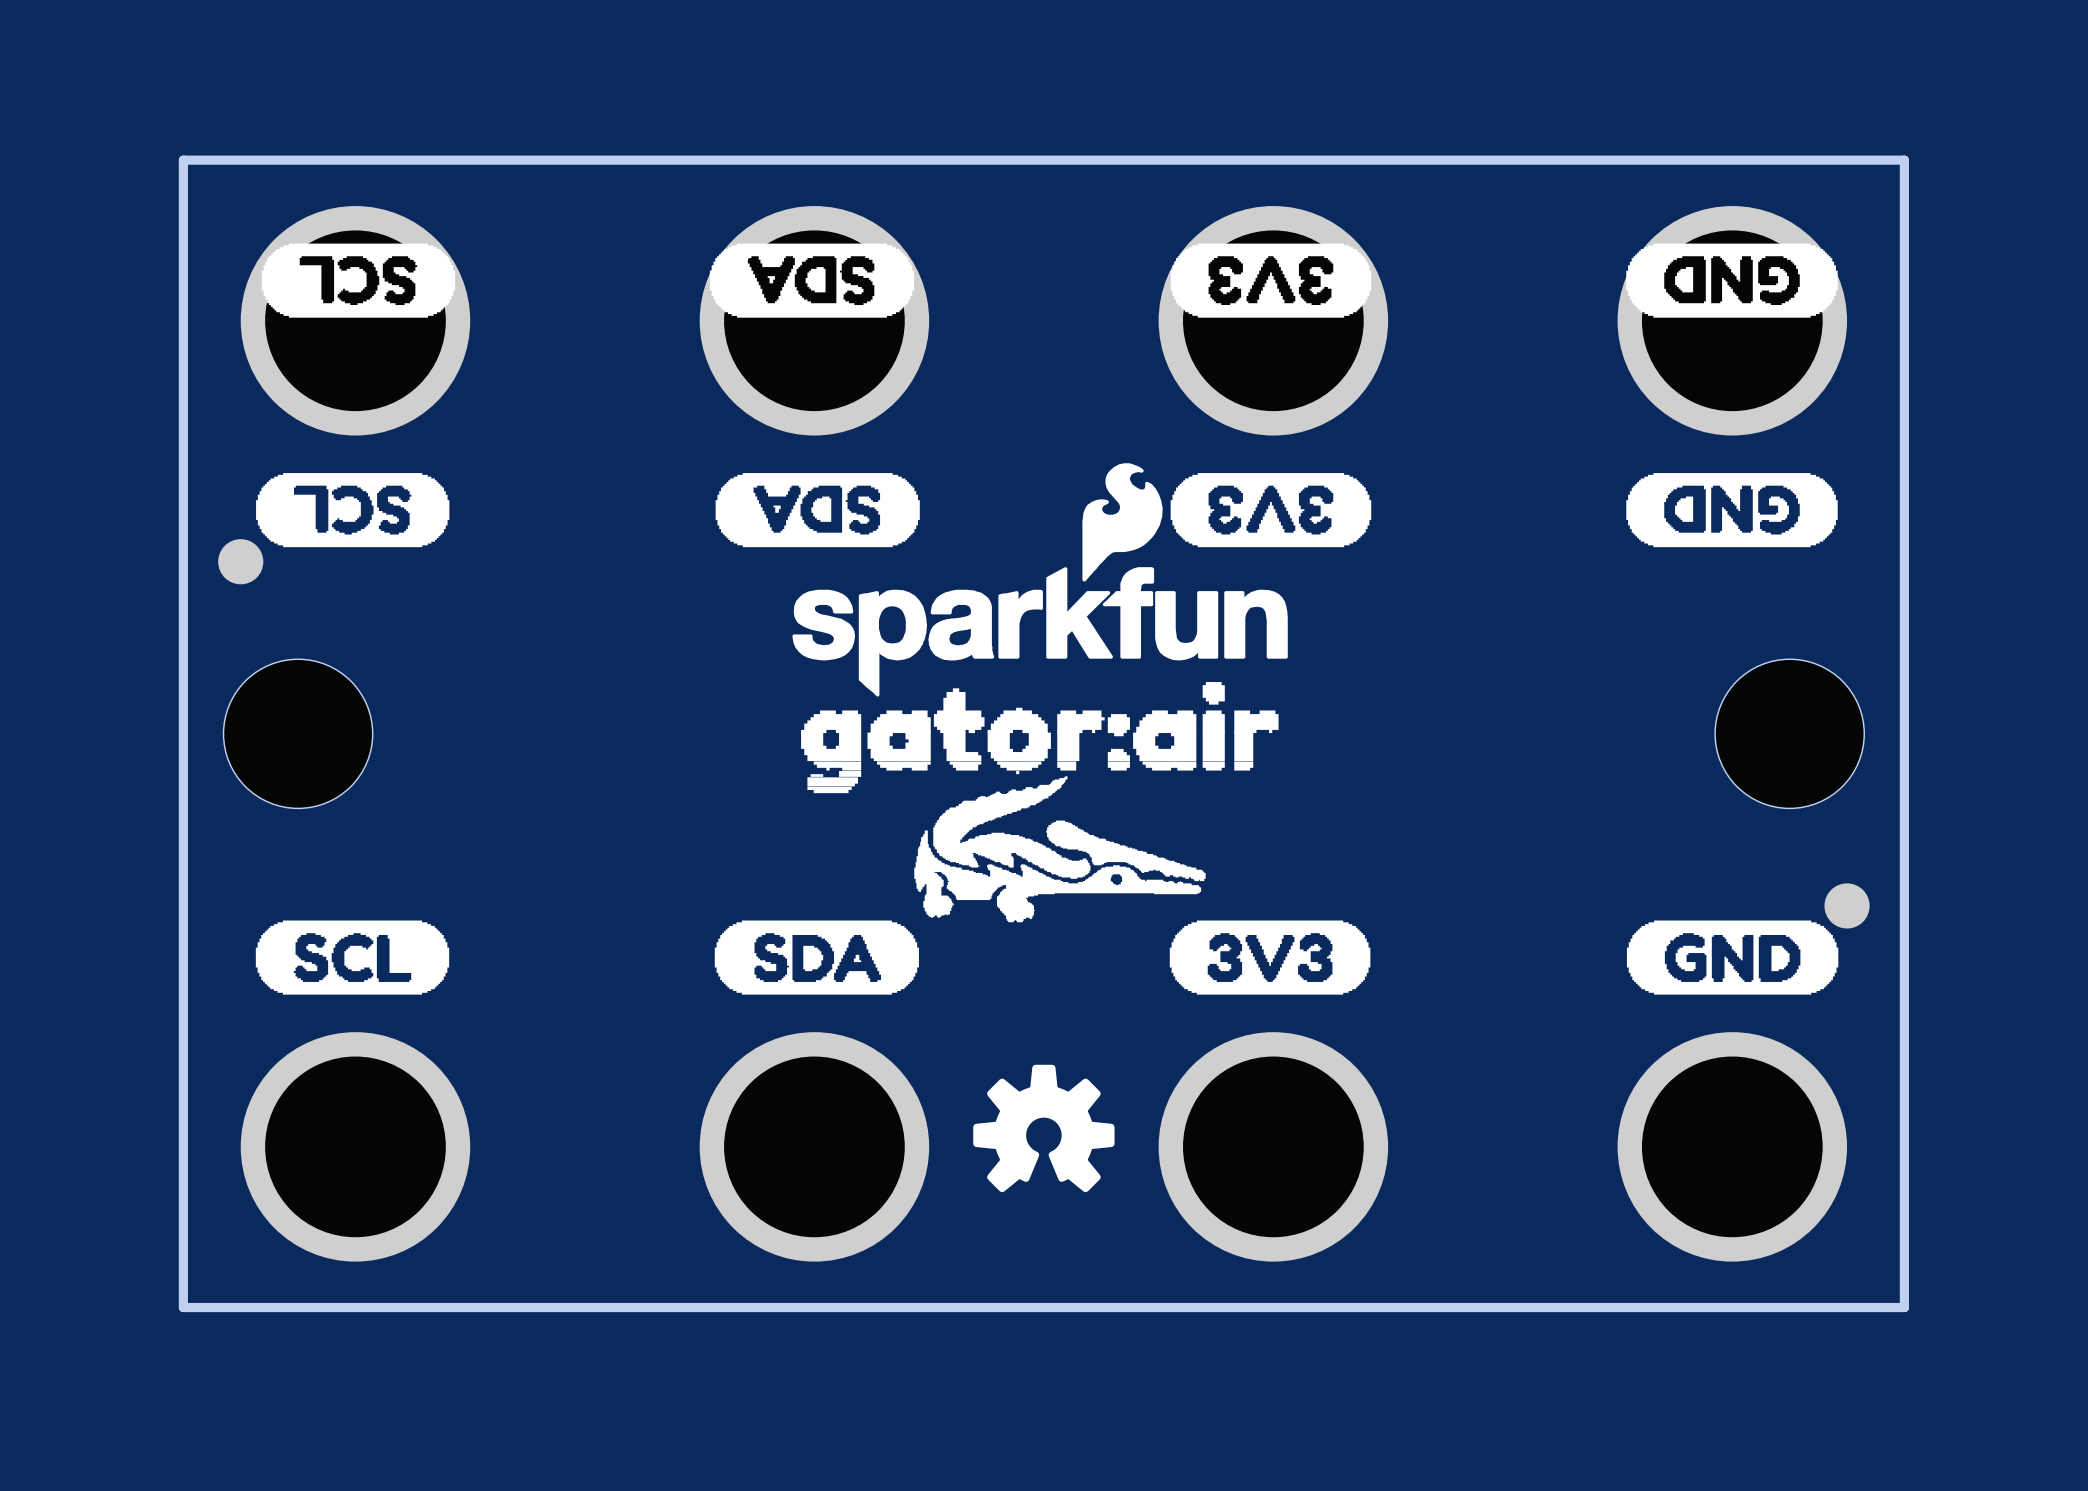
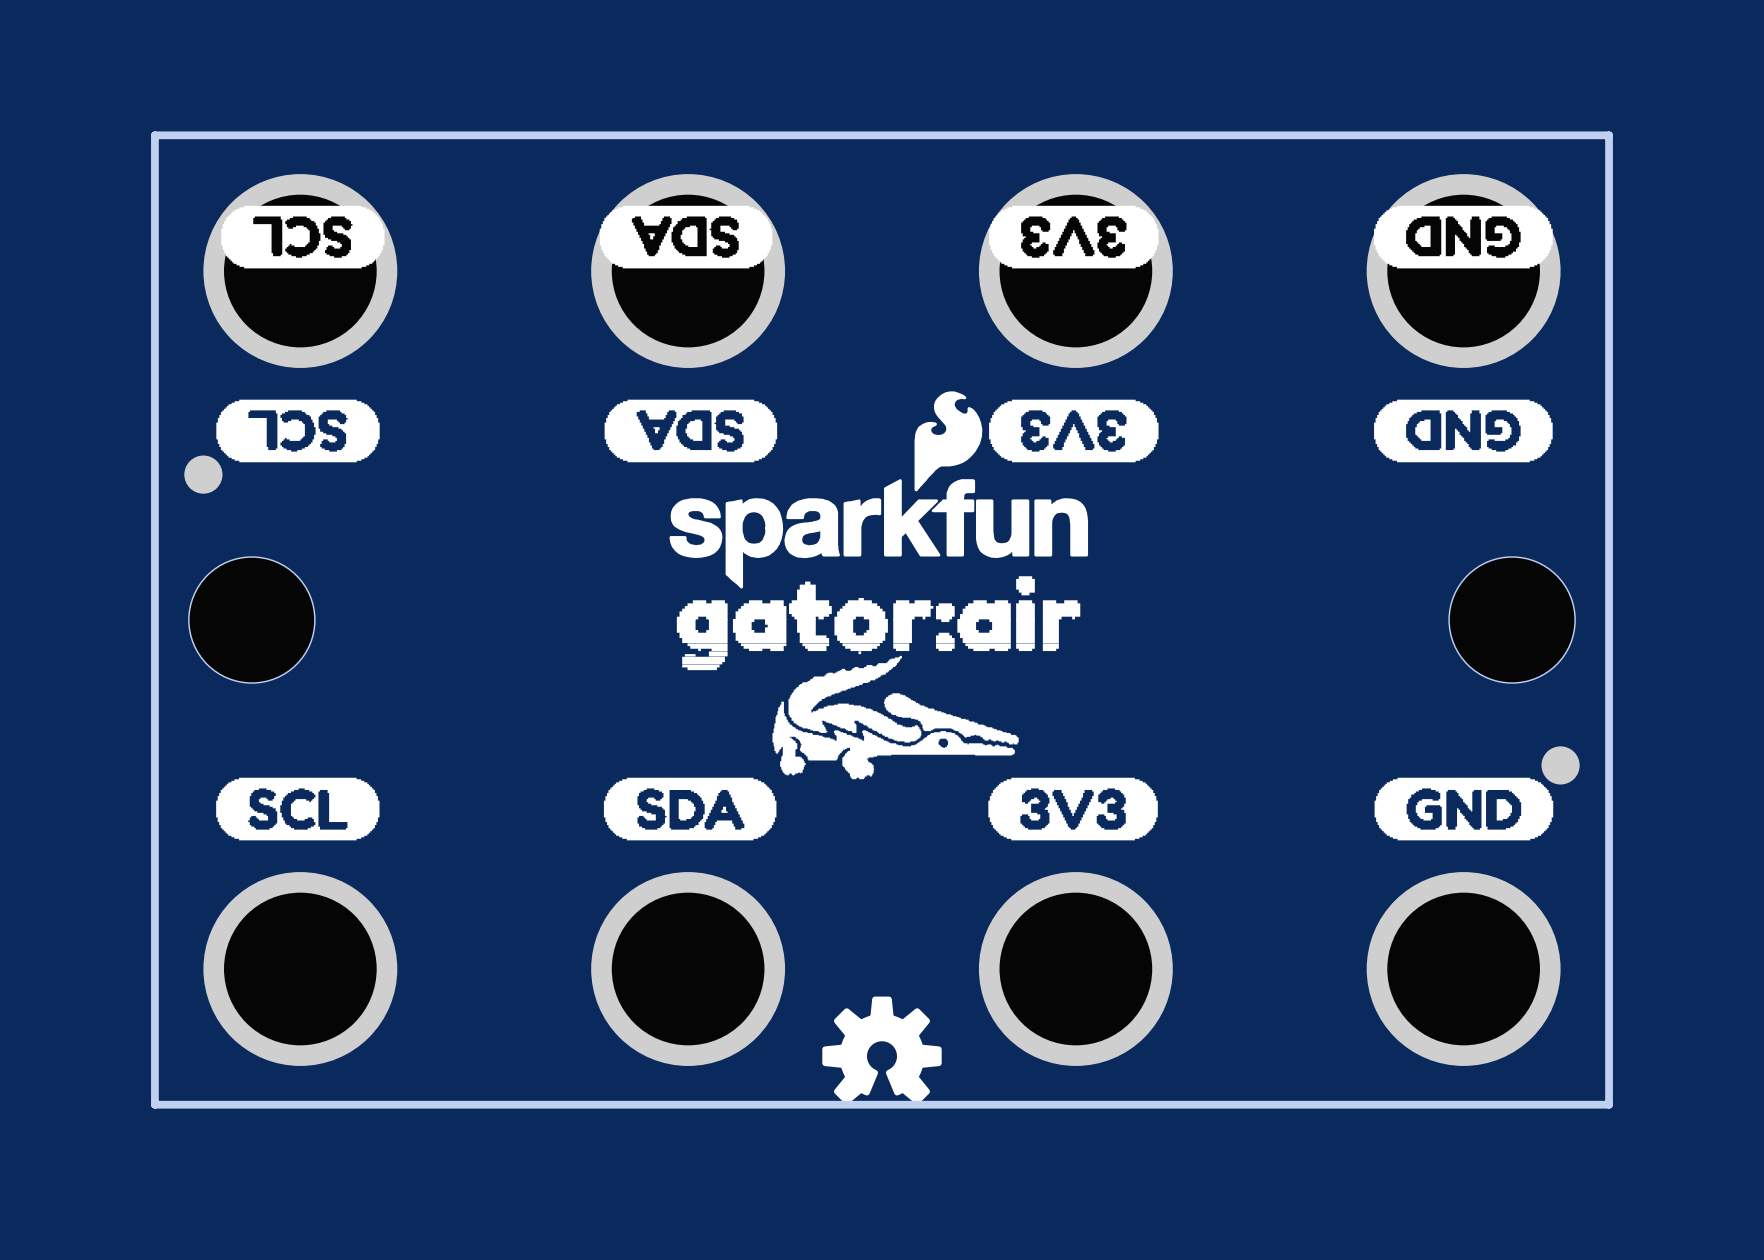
drawing position: (1043, 1128) -> (881, 1050)

